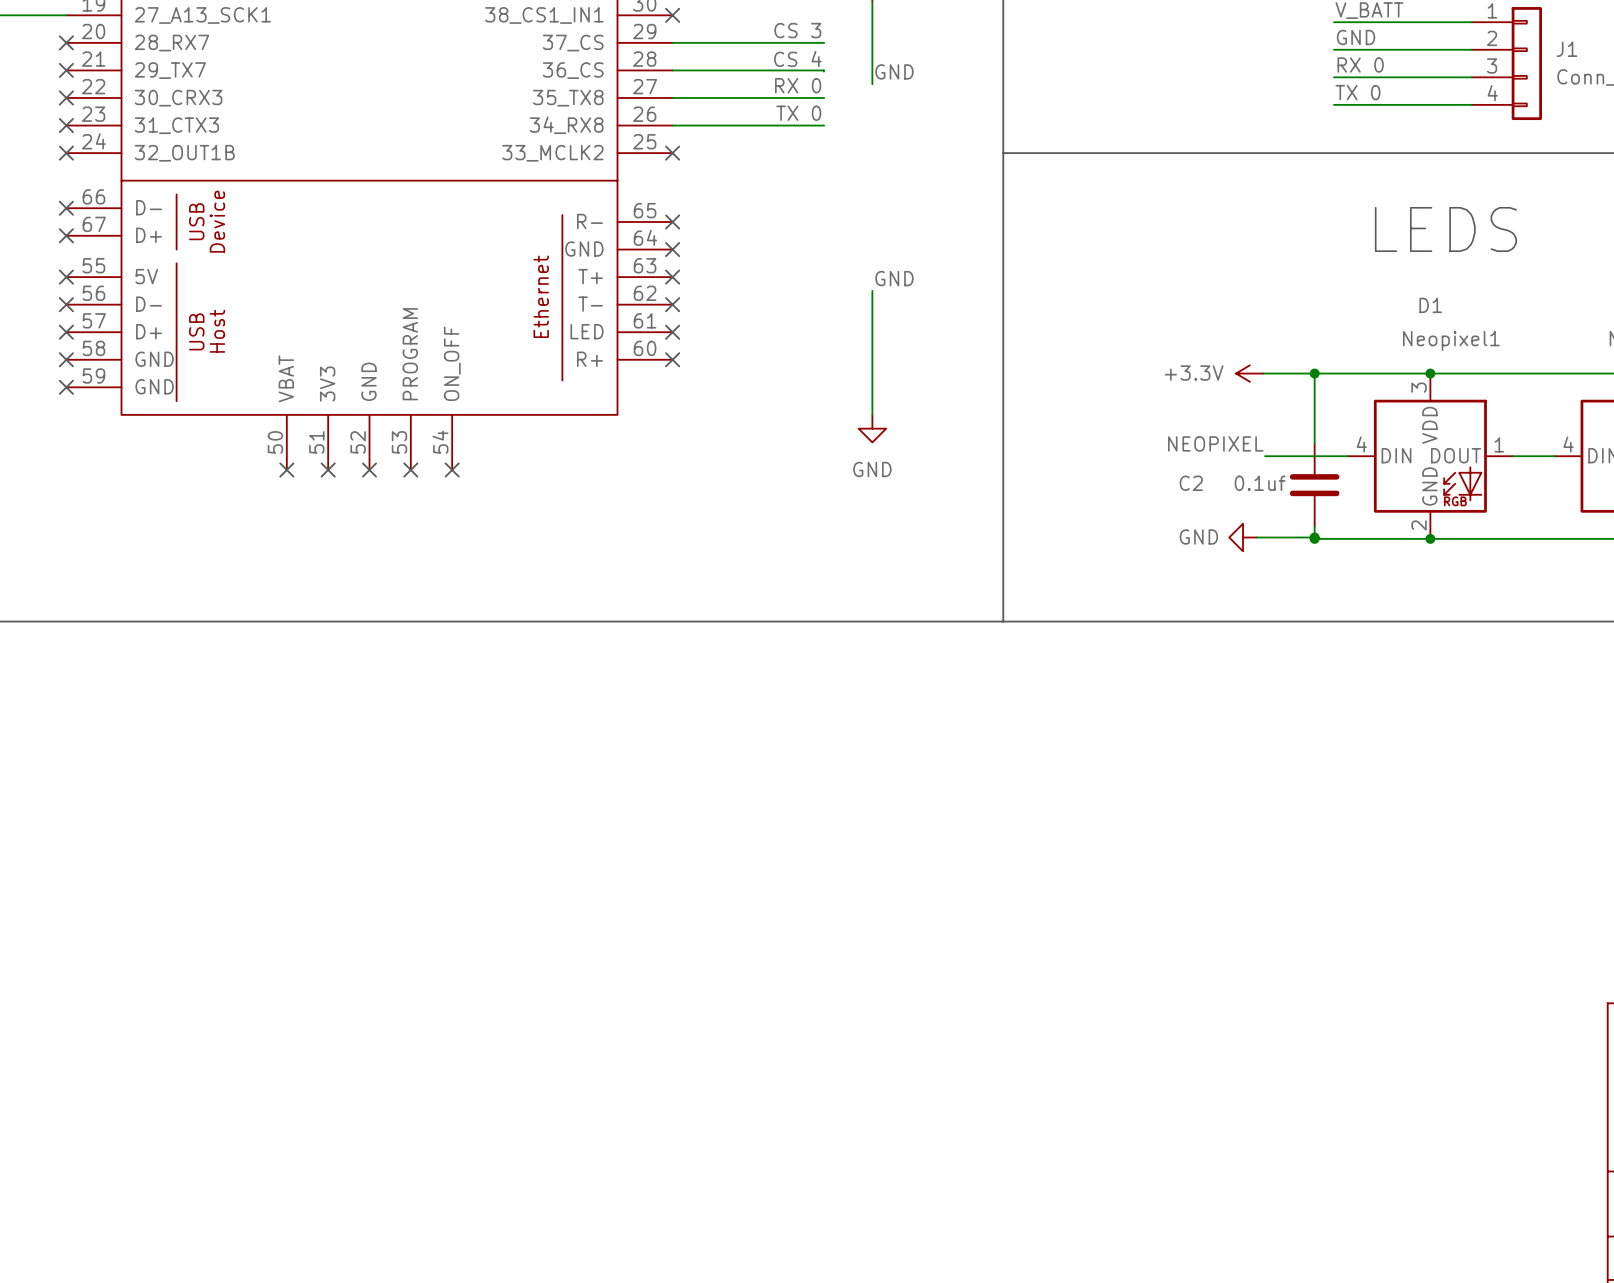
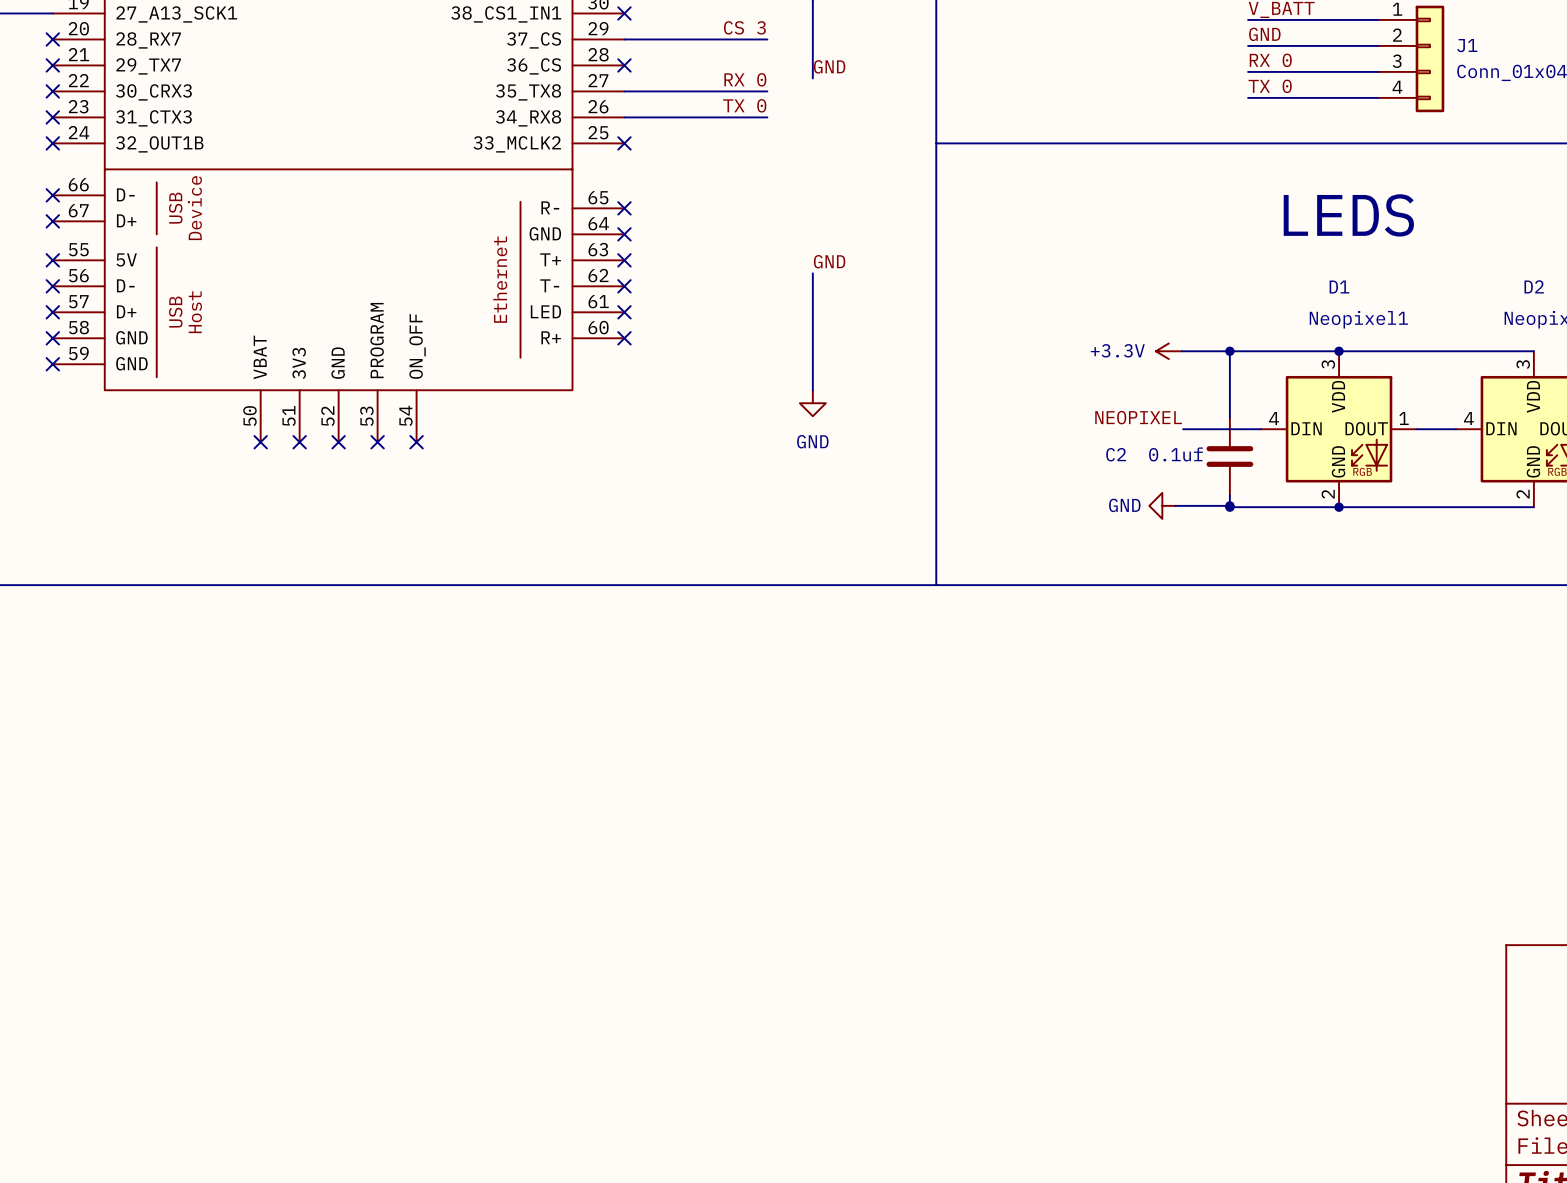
label: CS 4 (797, 58) -> none
wire: (672, 70) (823, 71) -> none
no-connect mark: none -> (624, 65)

